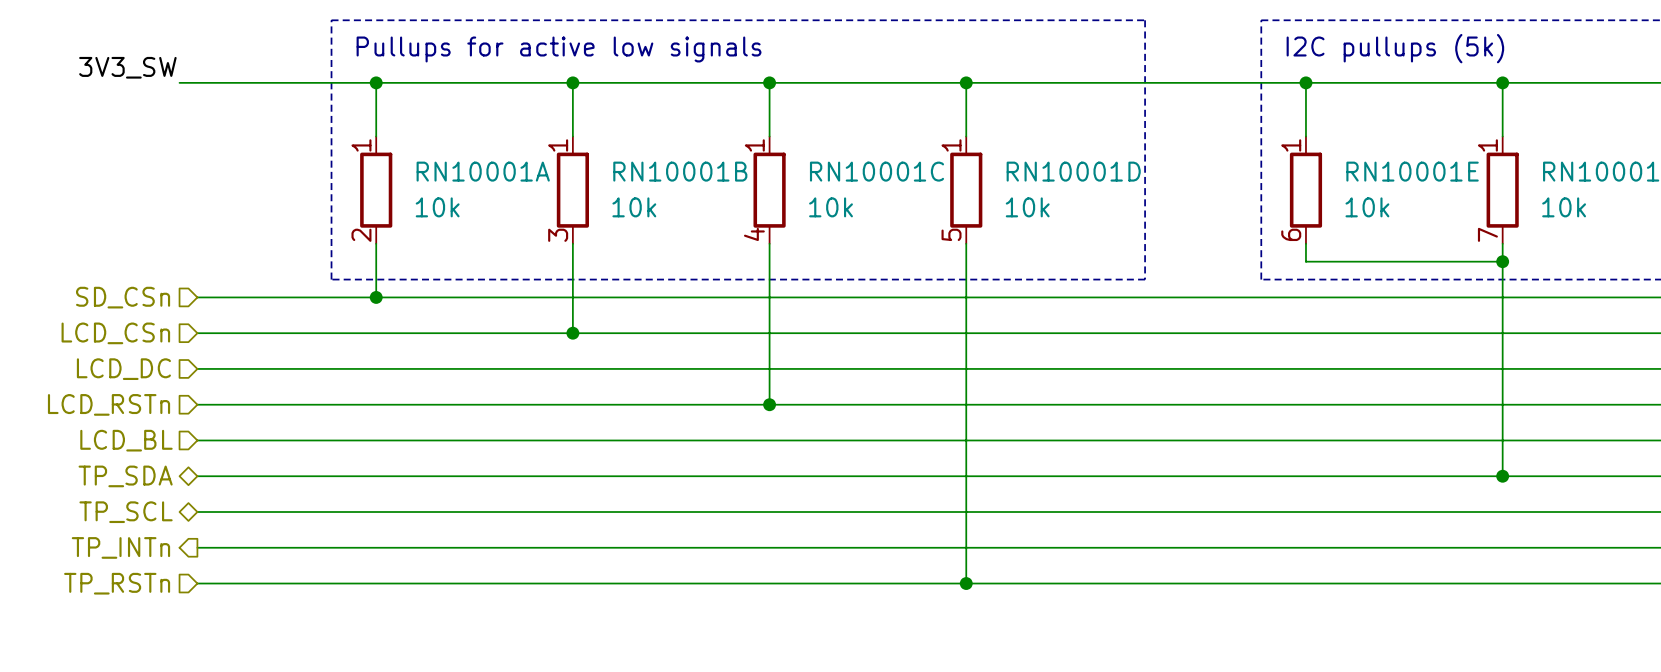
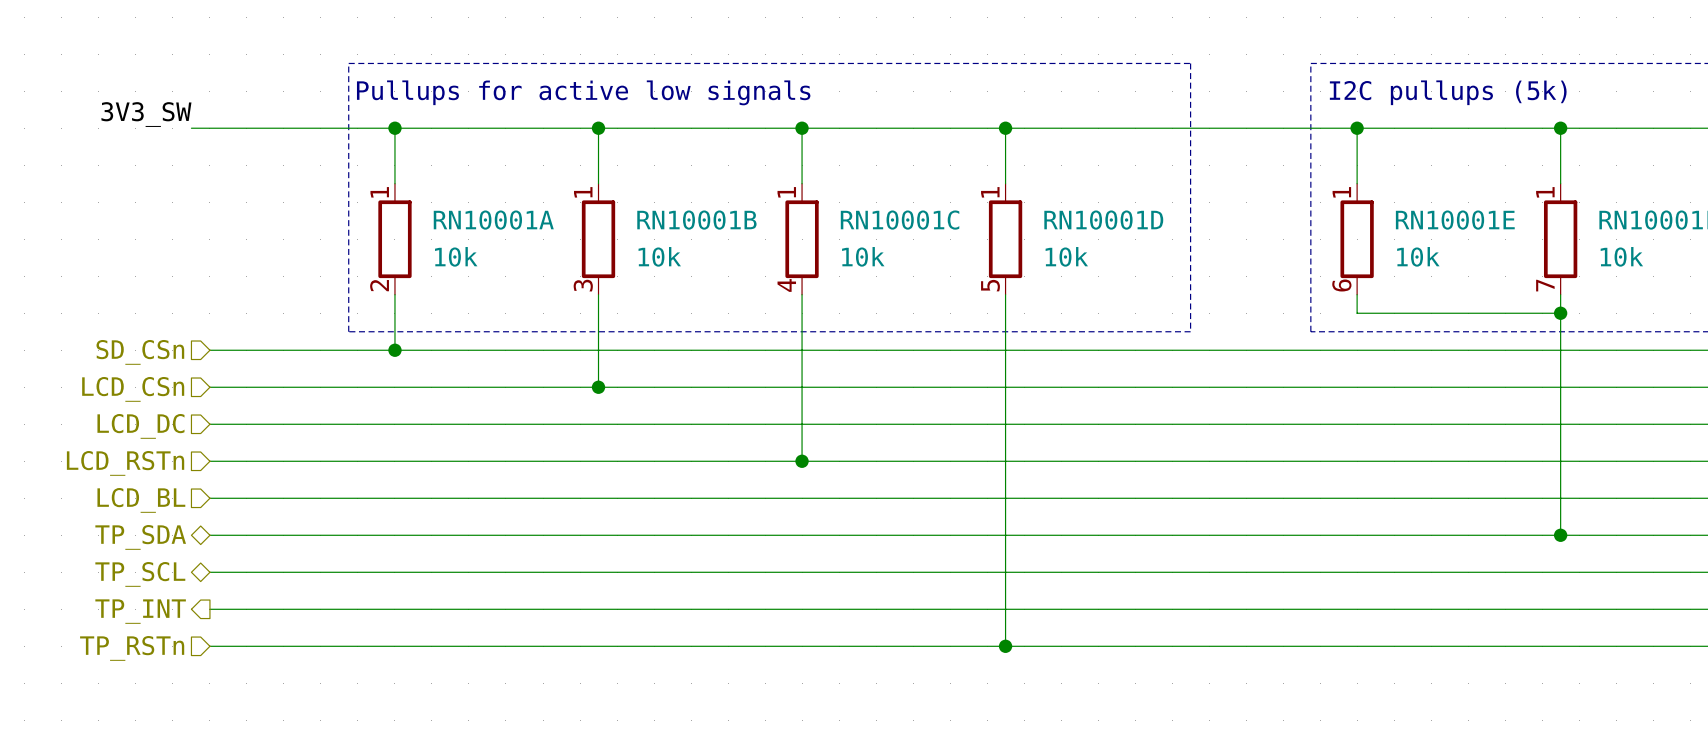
hierarchical label: TP_INTn (120, 547) -> TP_INT (140, 611)

